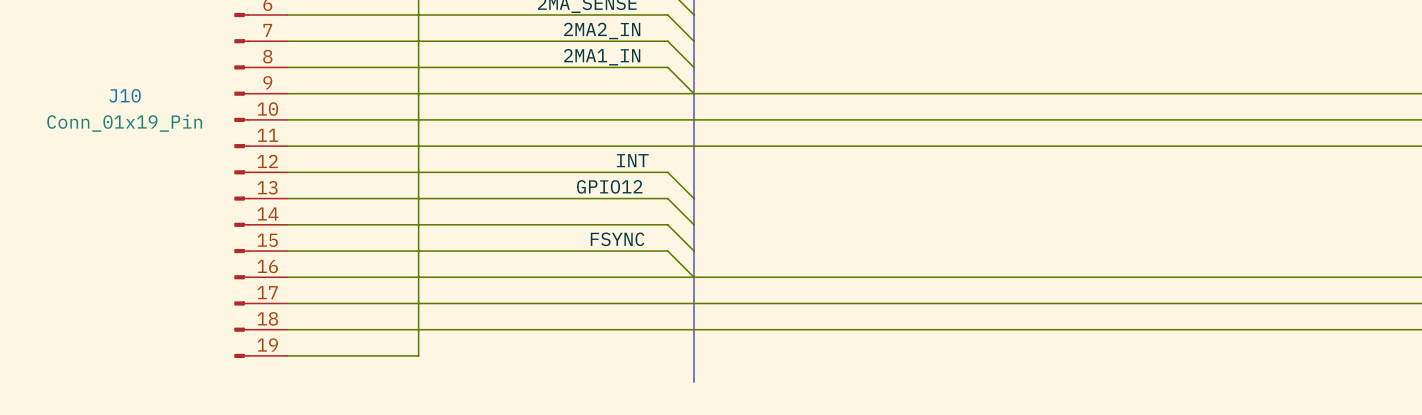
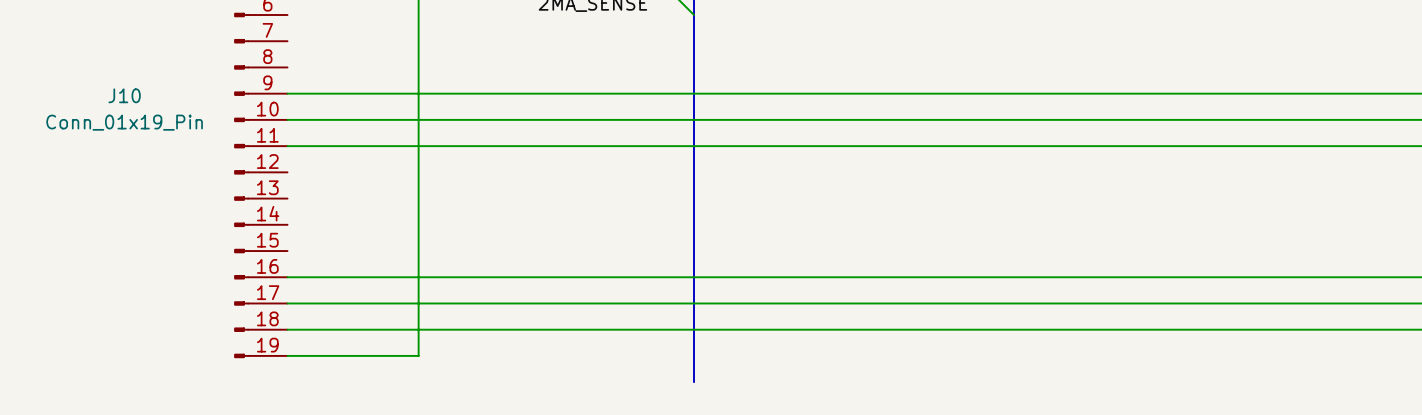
wire: (287, 15) (667, 15) (694, 41) -> none
label: 2MA2_IN (602, 31) -> none
wire: (287, 41) (667, 41) (694, 67) -> none
label: 2MA1_IN (602, 57) -> none
wire: (287, 67) (667, 67) (694, 93) -> none
label: INT (632, 160) -> none
wire: (287, 172) (667, 172) (694, 198) -> none
label: GPIO12 (609, 186) -> none
wire: (287, 198) (667, 198) (694, 224) -> none
wire: (287, 224) (667, 224) (694, 251) -> none
label: FSYNC (617, 239) -> none
wire: (287, 251) (667, 251) (694, 277) -> none

